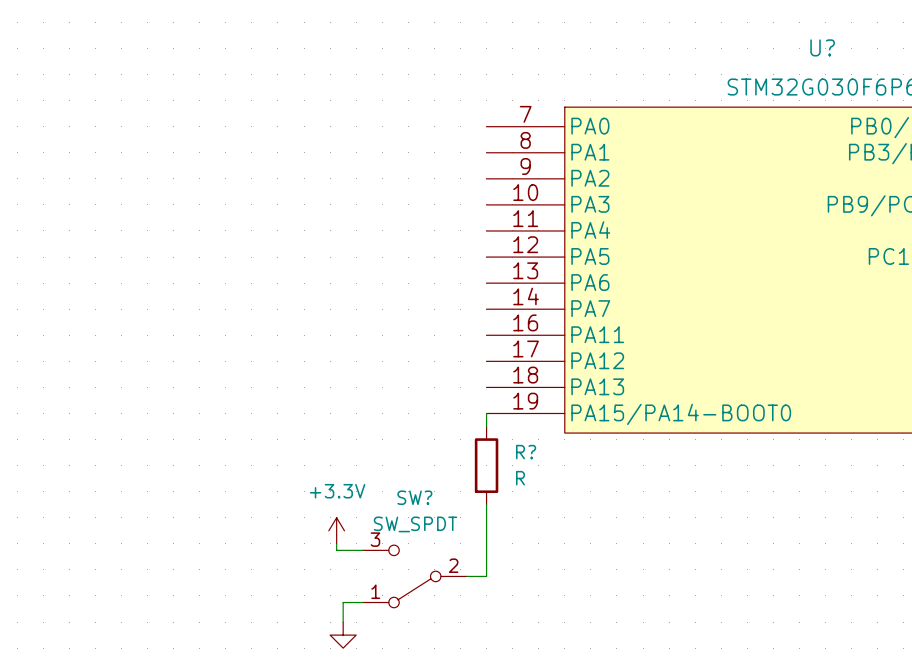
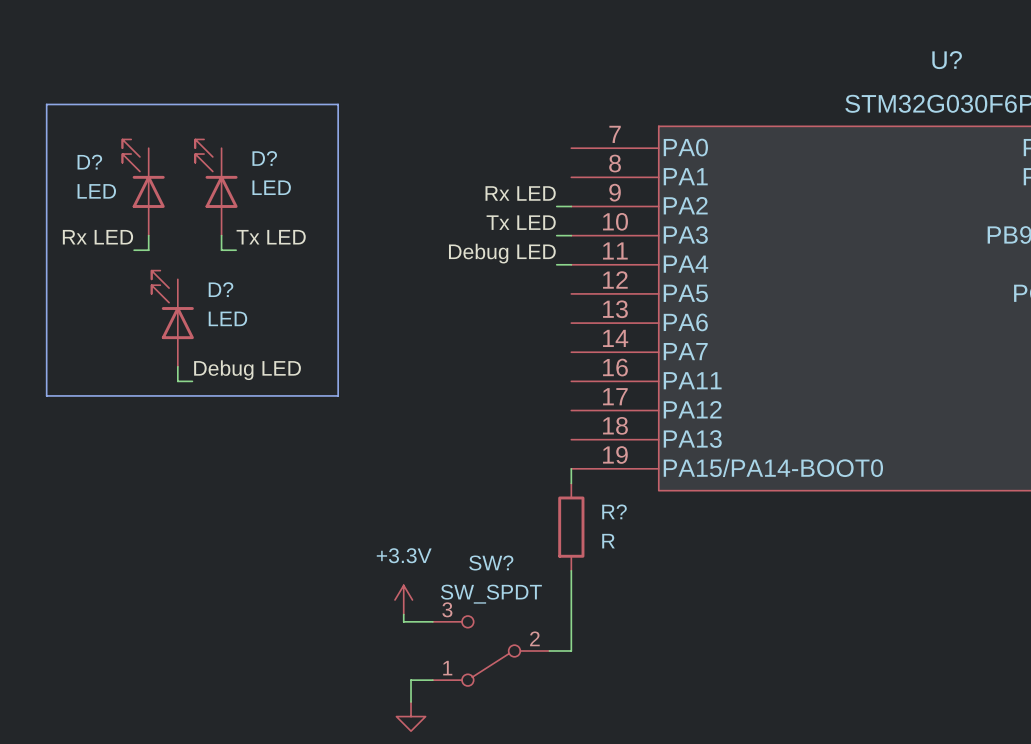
line: none -> (46, 104) (338, 104) (338, 395) (46, 395) (46, 104)
D?: none -> LED (143, 187)
D?: none -> LED (216, 187)
label: none -> Rx LED (520, 193)
wire: none -> (556, 206) (571, 206)
label: none -> Tx LED (521, 222)
wire: none -> (148, 235) (148, 250) (134, 250)
wire: none -> (221, 235) (221, 250) (236, 250)
wire: none -> (556, 235) (571, 235)
label: none -> Rx LED (97, 237)
label: none -> Tx LED (271, 237)
label: none -> Debug LED (502, 253)
wire: none -> (556, 264) (571, 264)
D?: none -> LED (172, 318)
wire: none -> (177, 366) (177, 381) (192, 381)
label: none -> Debug LED (247, 370)

